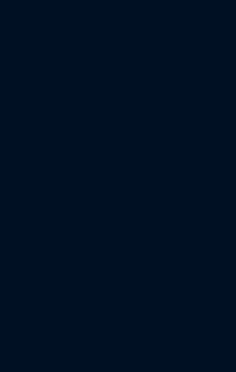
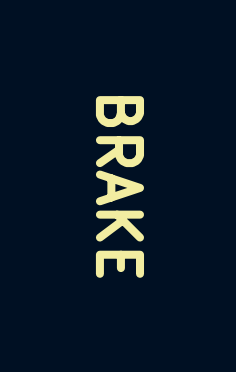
text: none -> BRAKE (119, 186)

